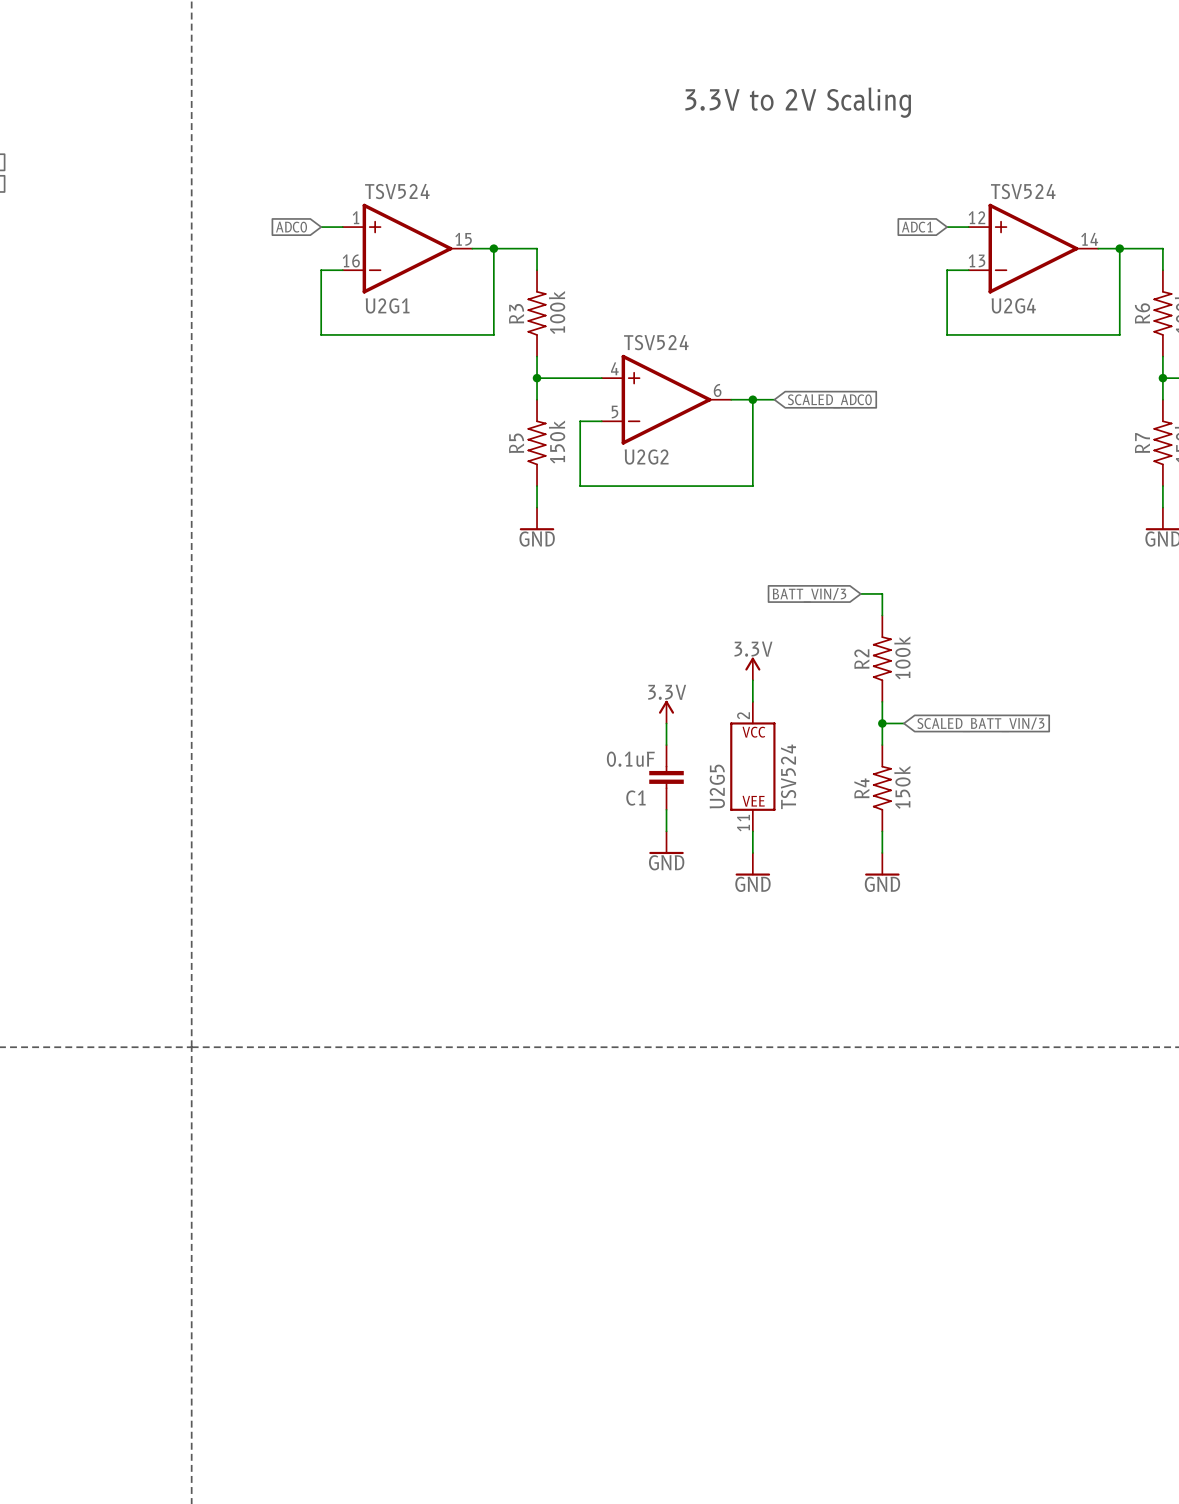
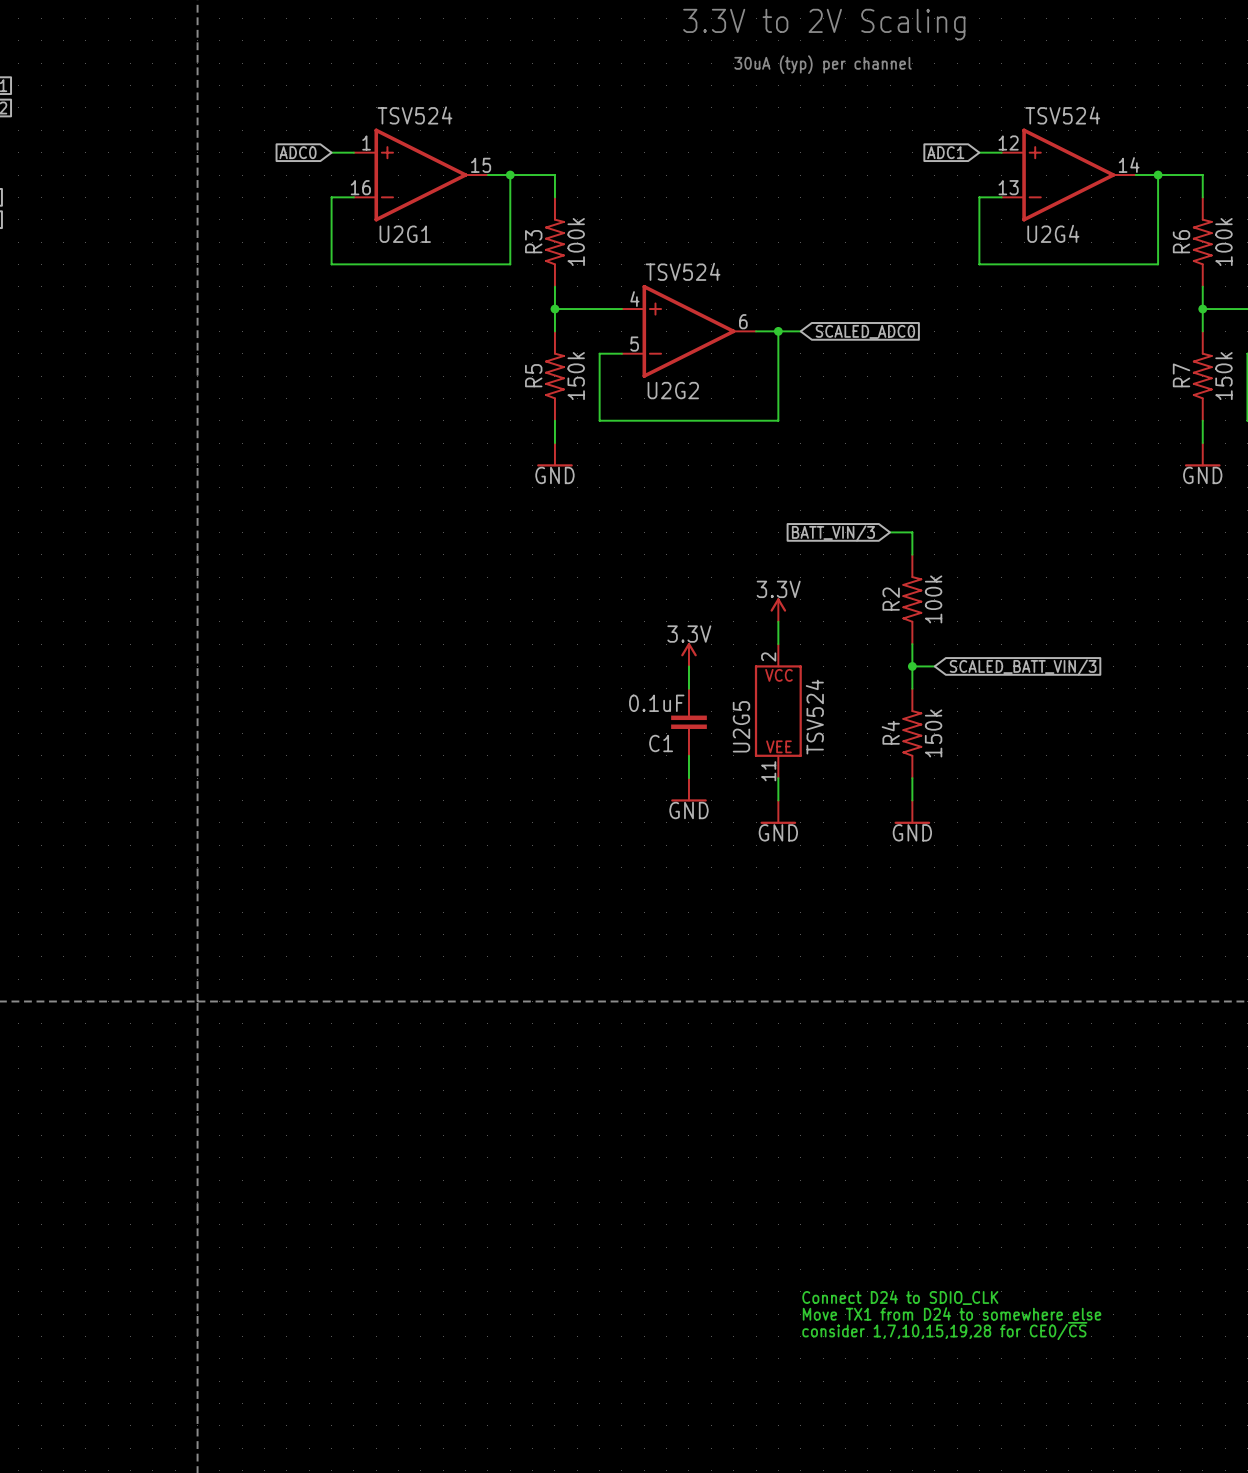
text: none -> 30uA (typ) per channel (823, 64)
text: none -> Connect D24 to SDIO_CLK (900, 1297)
text: none -> Move TX1 from D24 to somewhere else (952, 1313)
text: none -> consider 1,7,10,15,19,28 for CE0/~{CS} (944, 1331)

